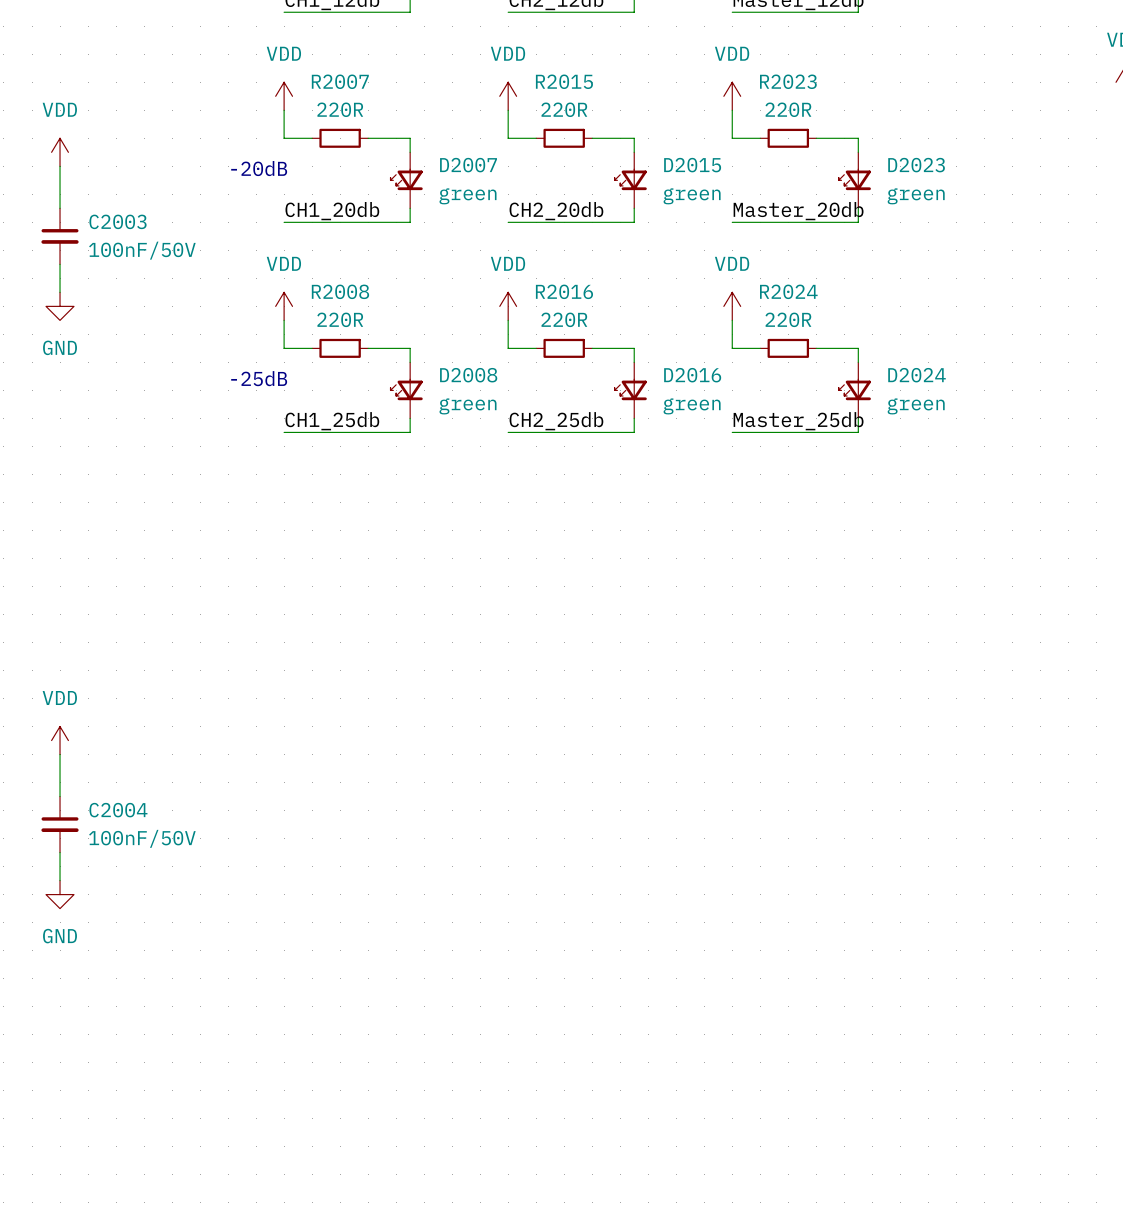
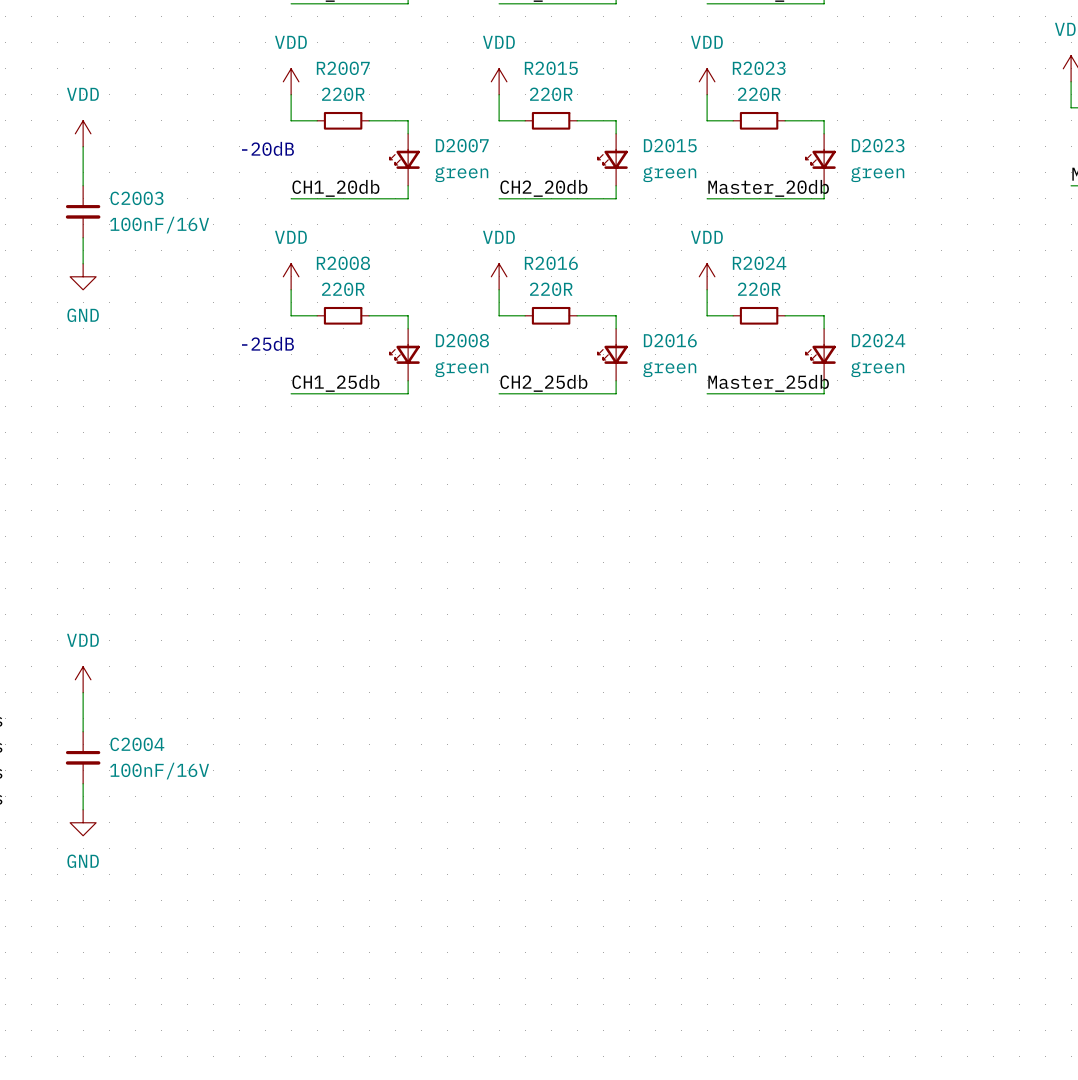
C2003 value: 100nF/50V (142, 250) -> 100nF/16V (159, 225)
C2004 value: 100nF/50V (142, 838) -> 100nF/16V (159, 771)

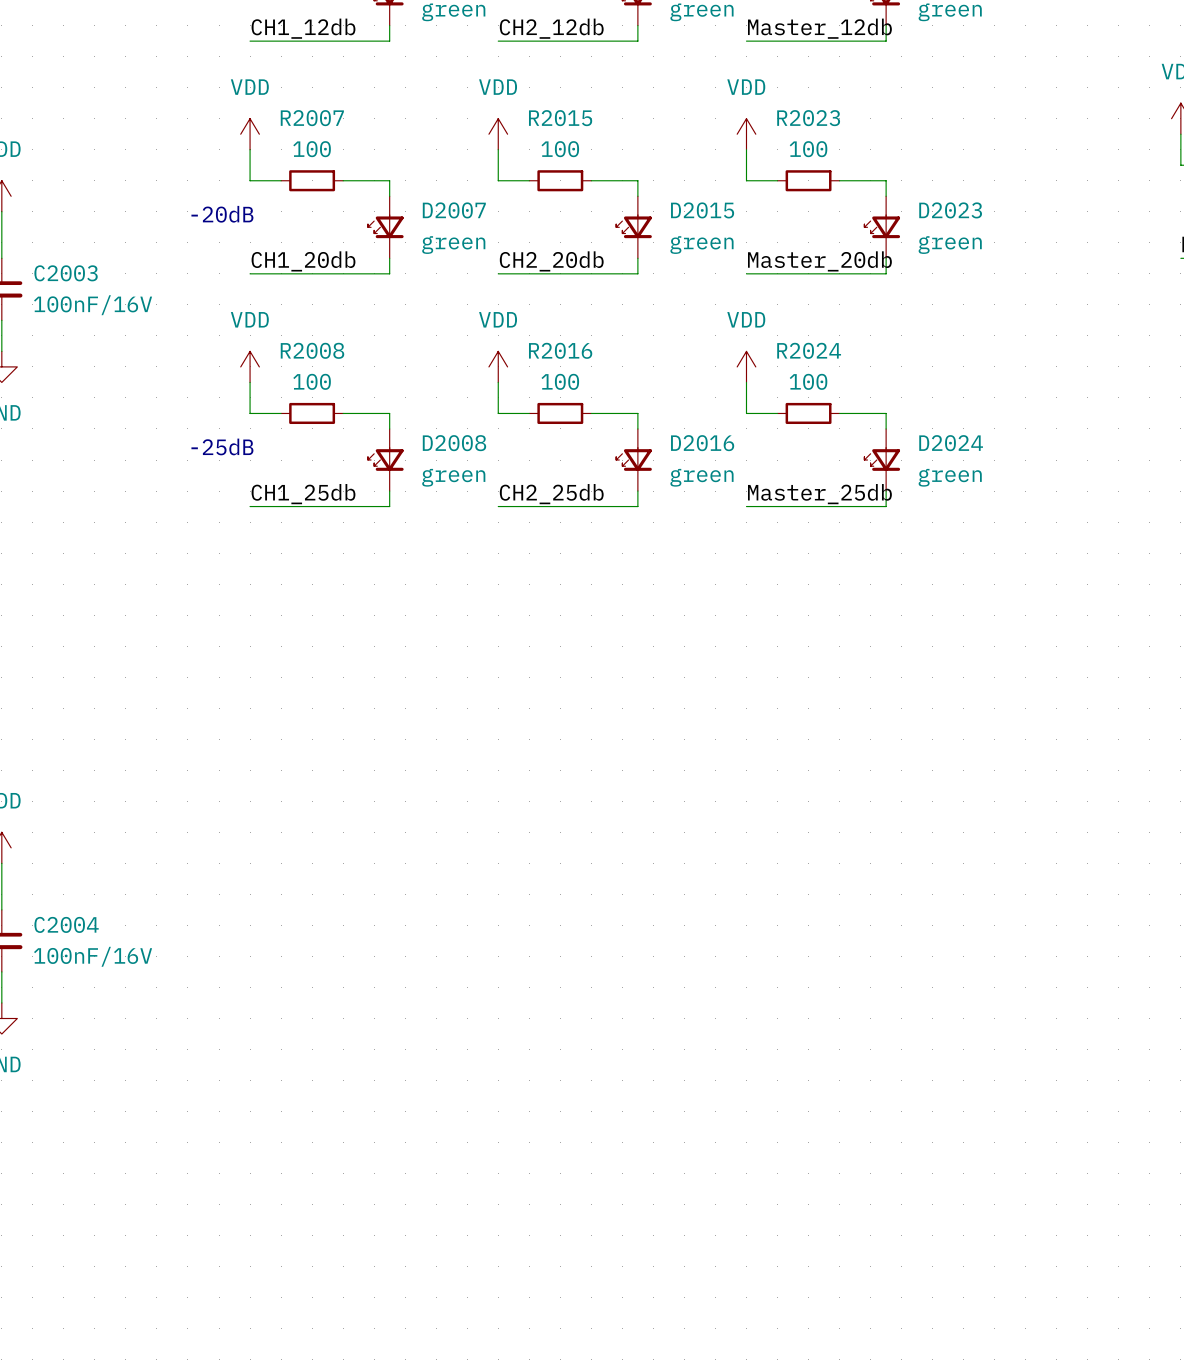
R2007 value: 220R (343, 94) -> 100 (312, 149)
R2015 value: 220R (551, 94) -> 100 (560, 149)
R2023 value: 220R (759, 94) -> 100 (808, 149)
R2008 value: 220R (343, 289) -> 100 (312, 381)
R2016 value: 220R (551, 289) -> 100 (560, 381)
R2024 value: 220R (759, 289) -> 100 (808, 381)

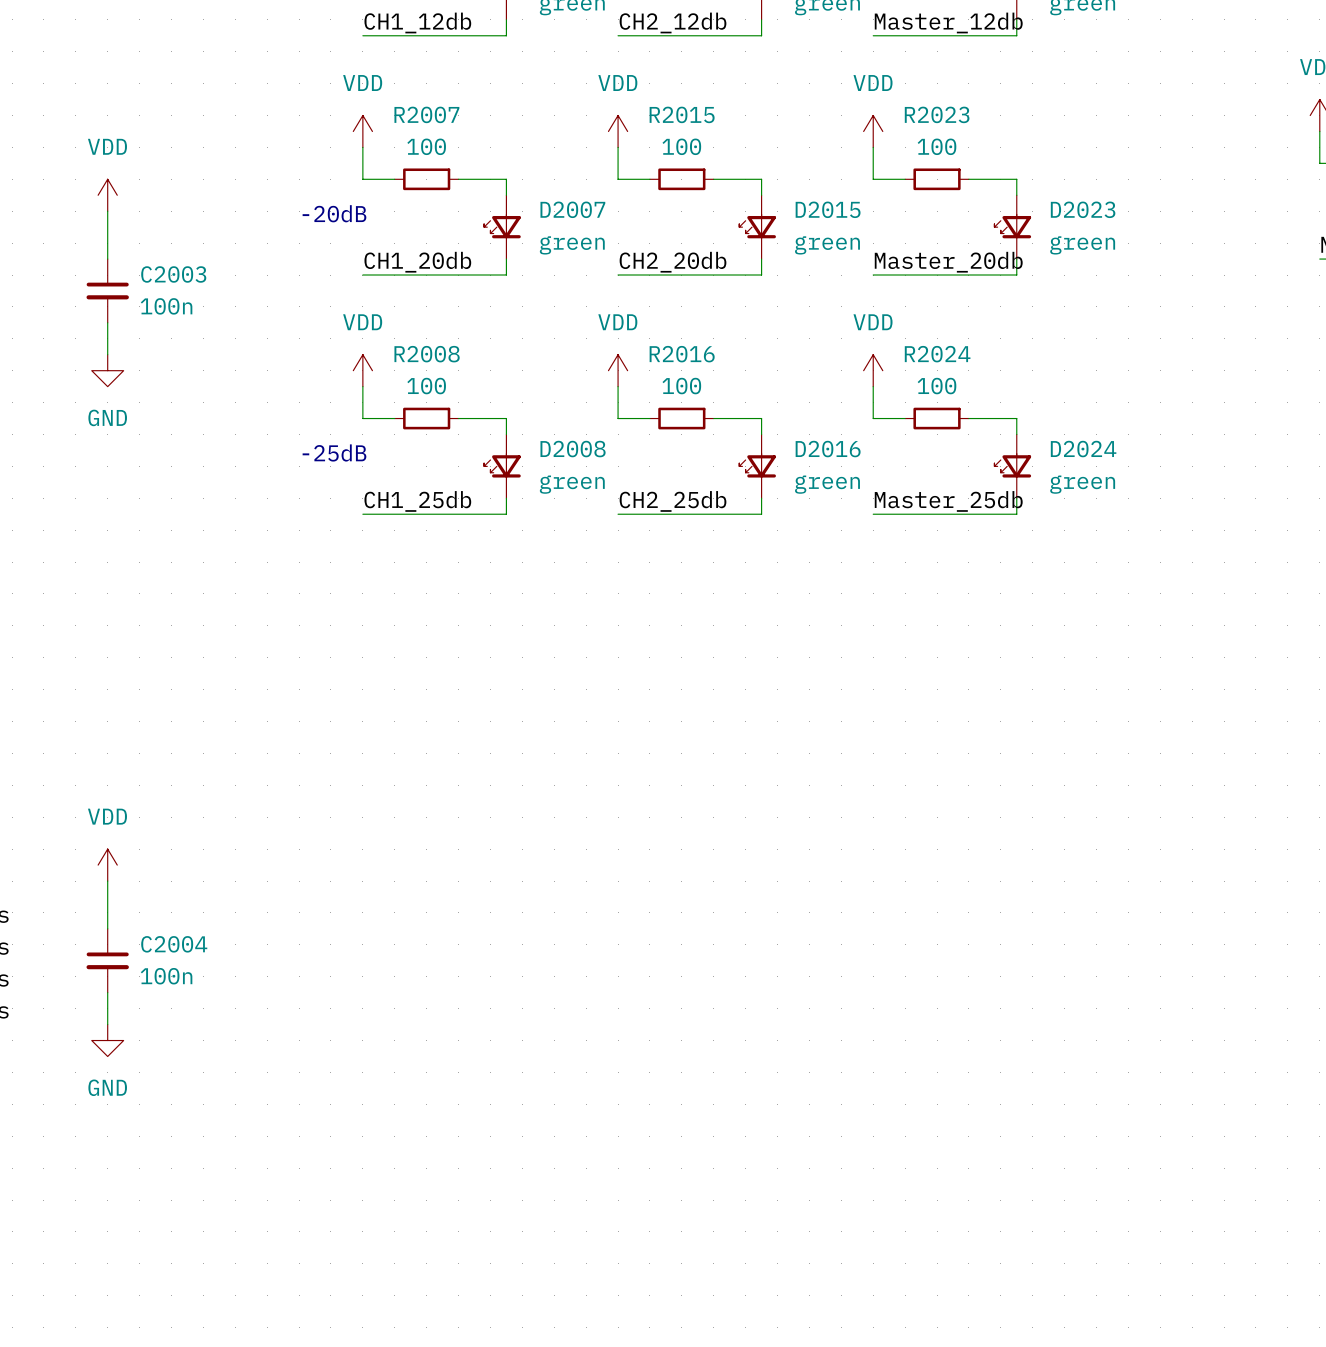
C2003 value: 100nF/16V (93, 305) -> 100n (166, 306)
C2004 value: 100nF/16V (93, 956) -> 100n (166, 976)

